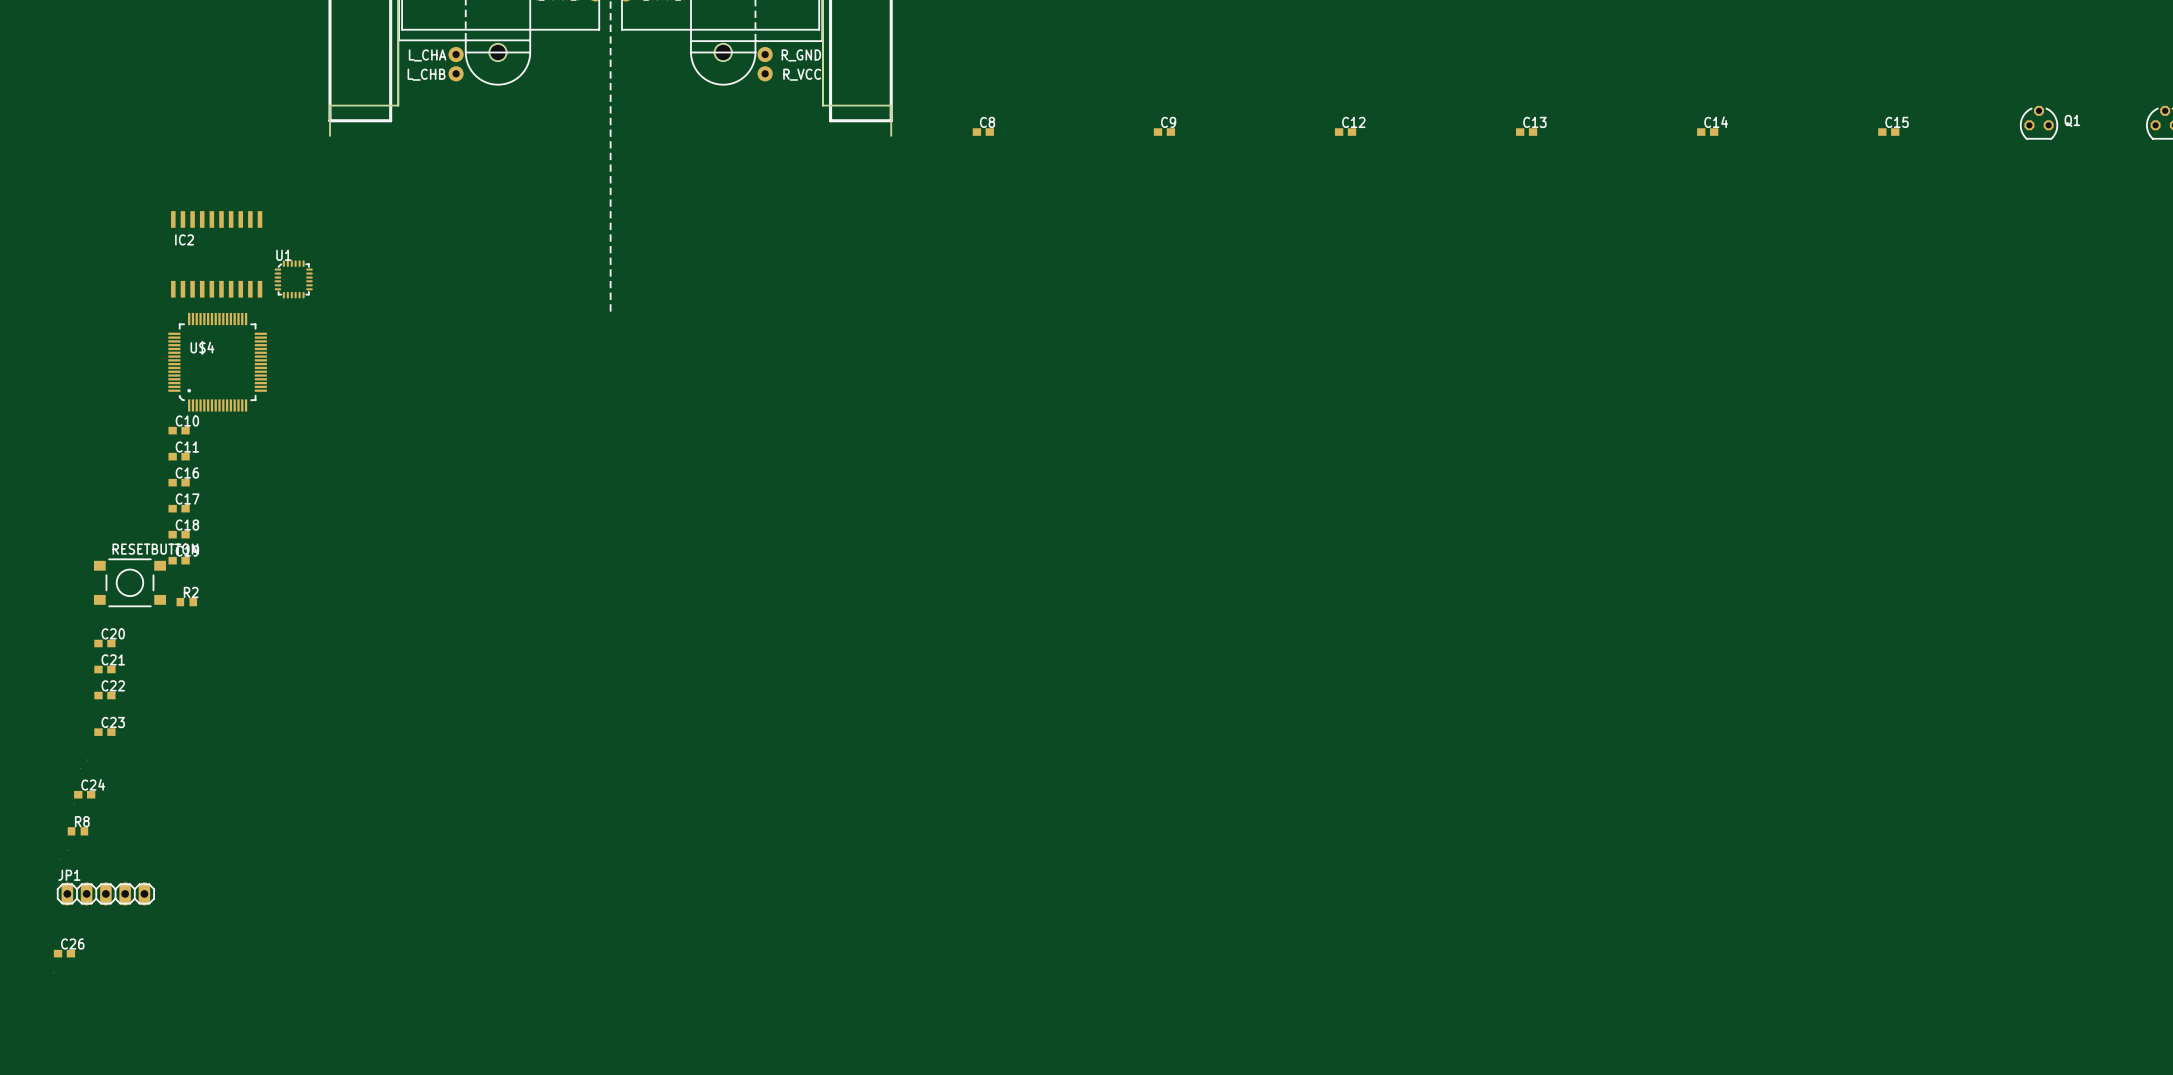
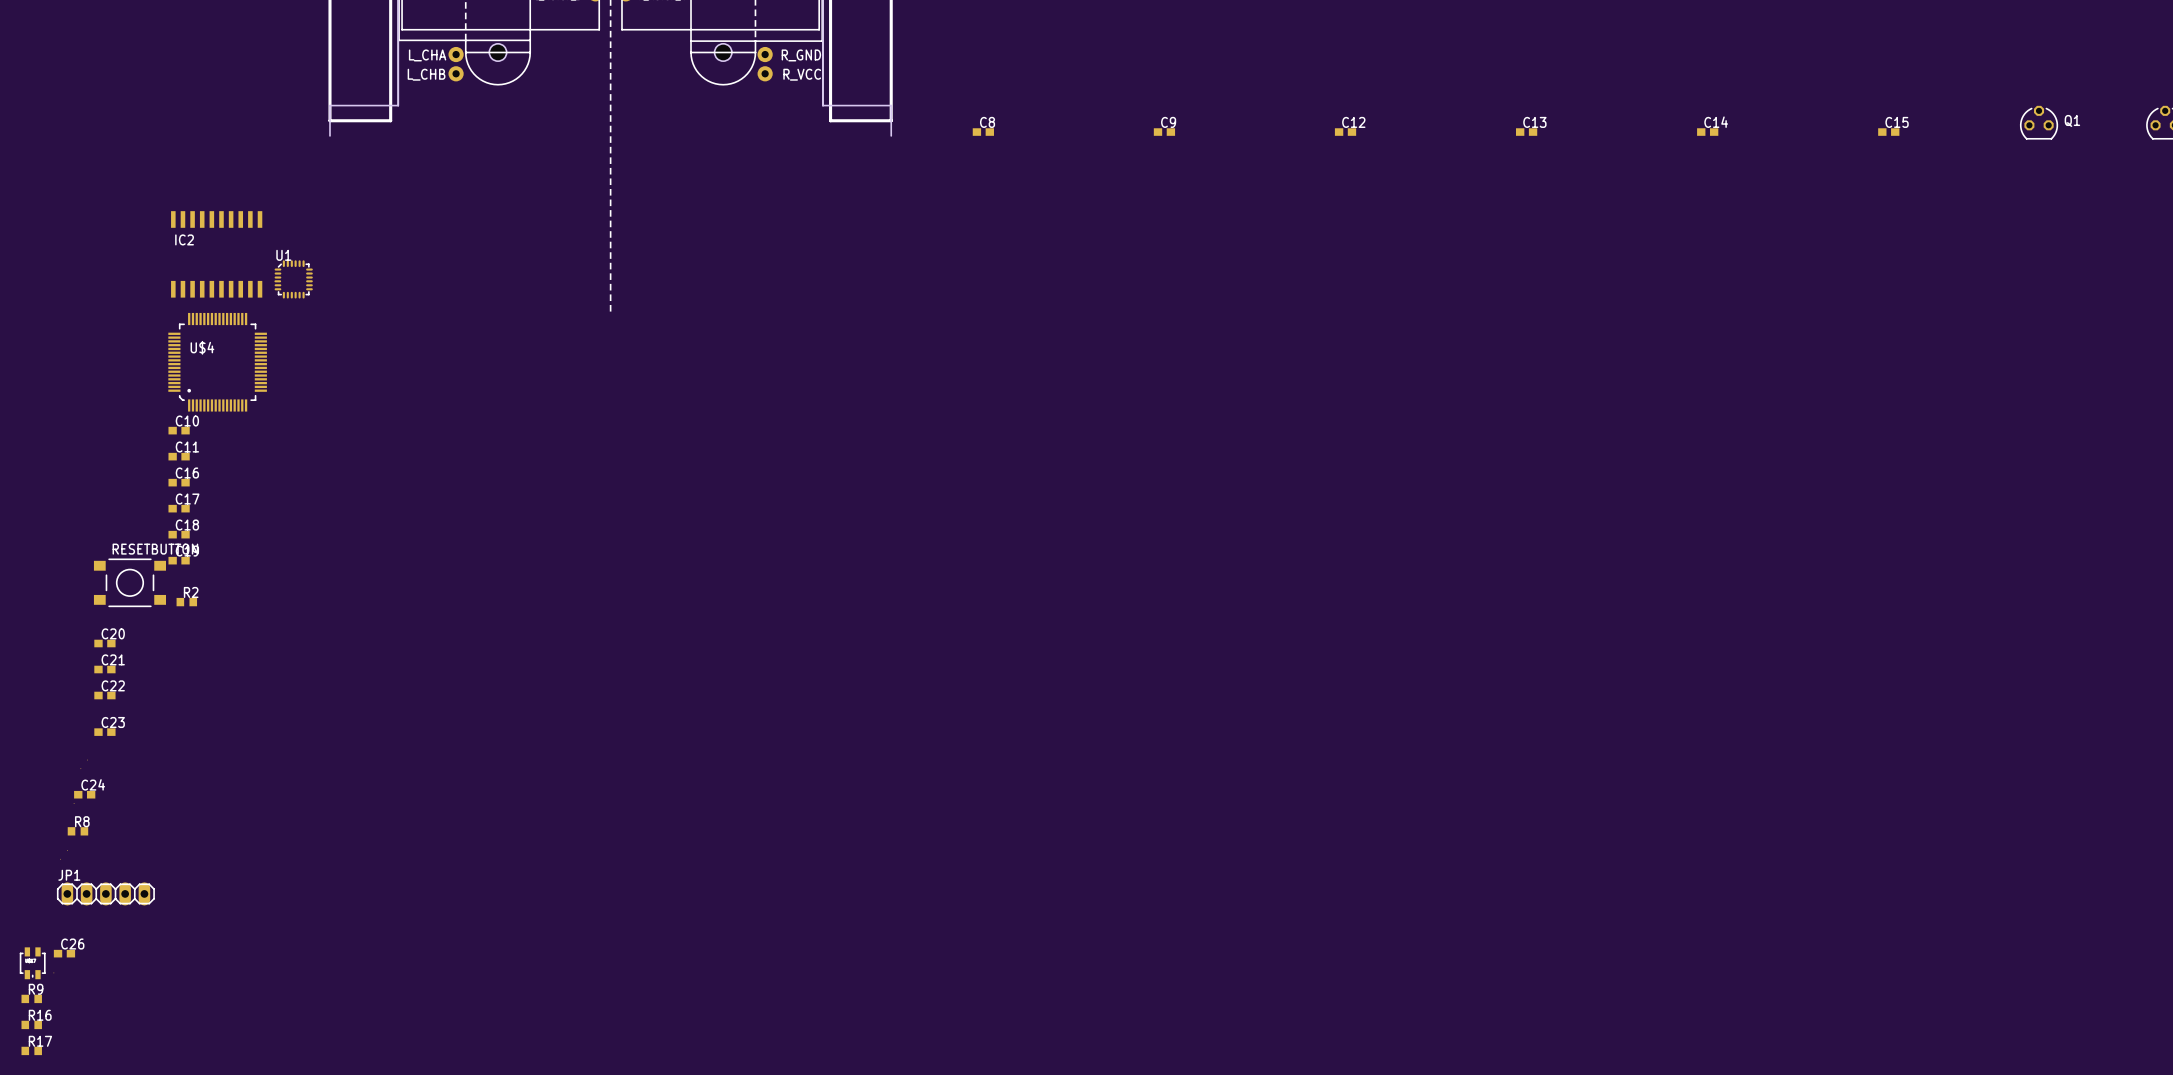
part: none -> (32, 963)
R9: none -> (31, 998)
R16: none -> (31, 1024)
R17: none -> (31, 1050)

